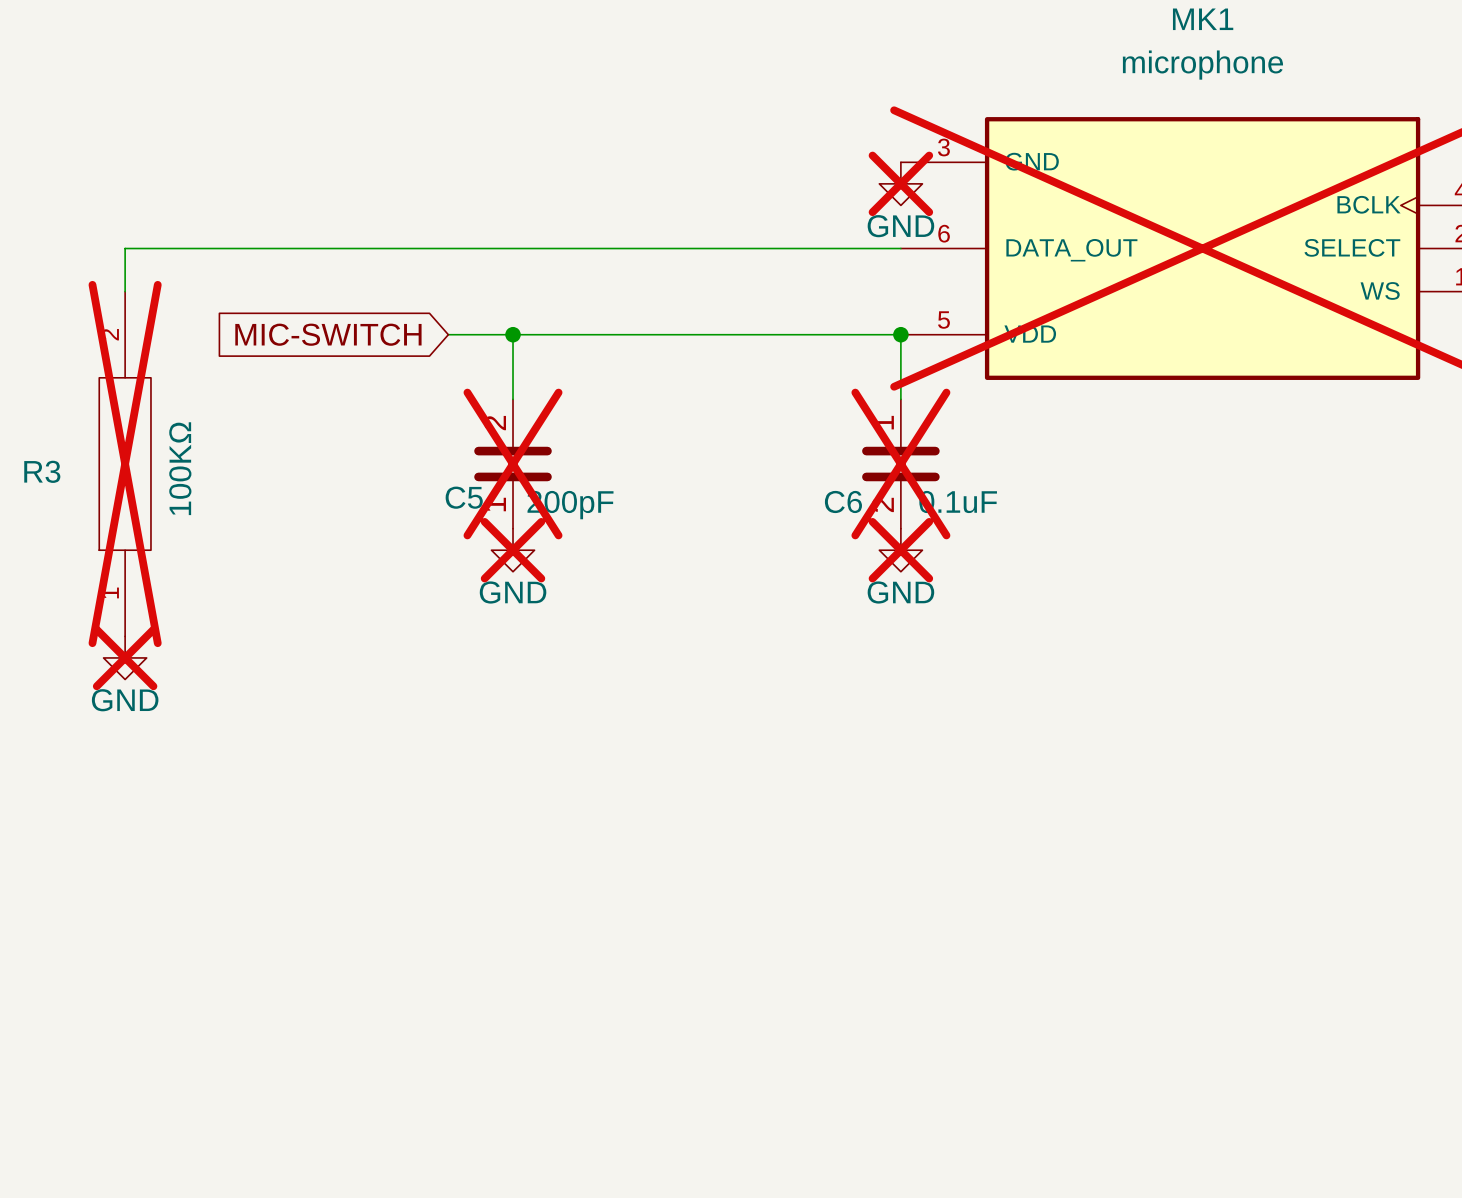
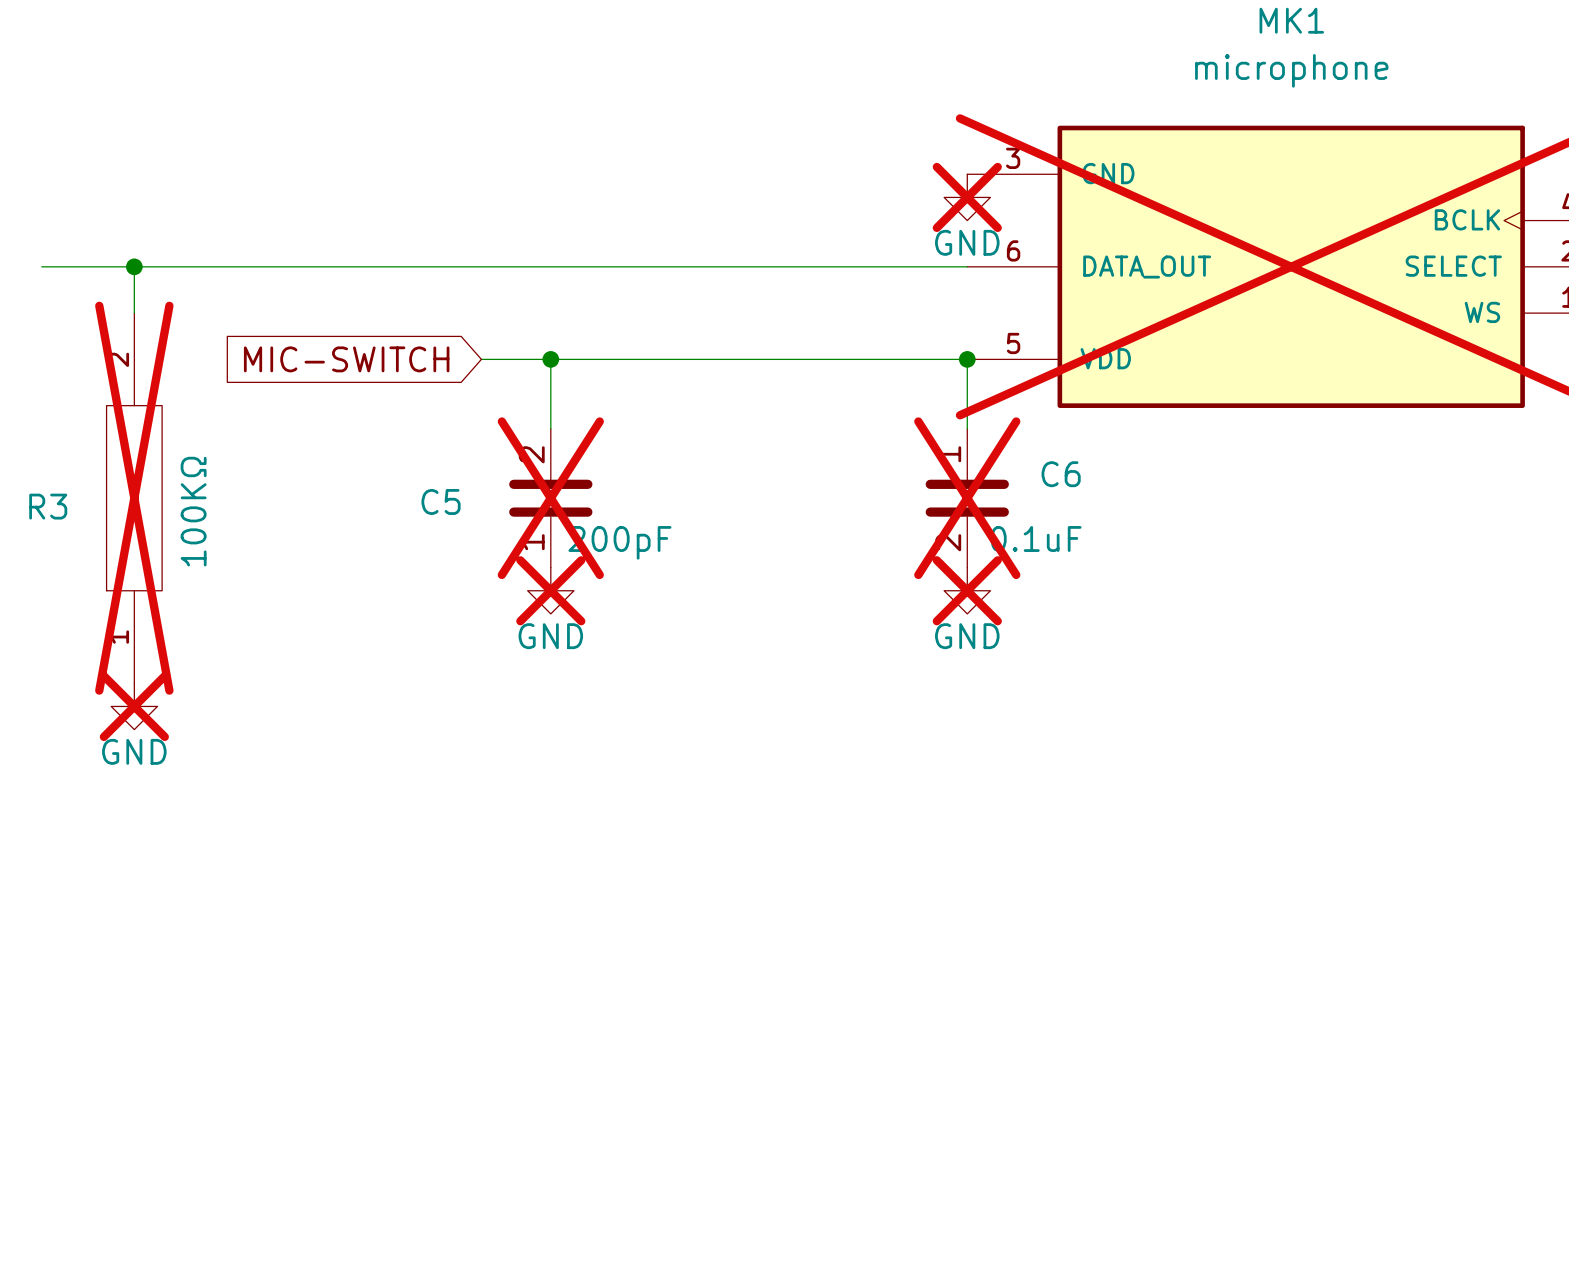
wire: none -> (41, 266) (134, 266)
junction: none -> (134, 266)
C5 name position: C5 (464, 497) -> C5 (441, 501)
C6 name position: C6 (843, 501) -> C6 (1061, 474)

